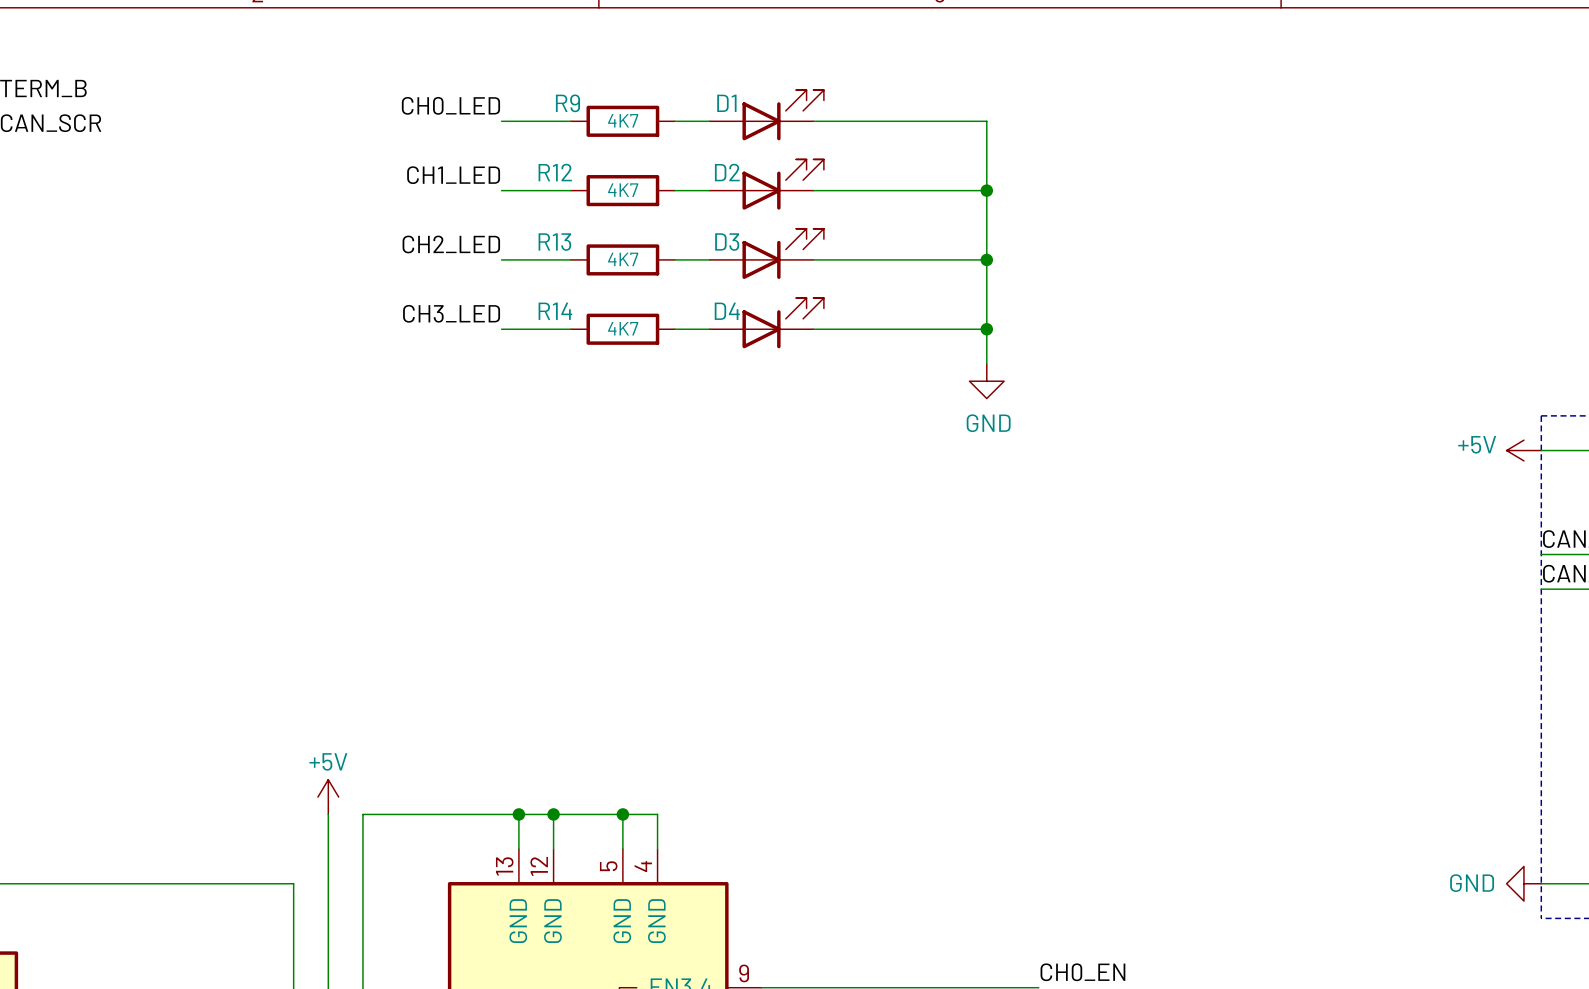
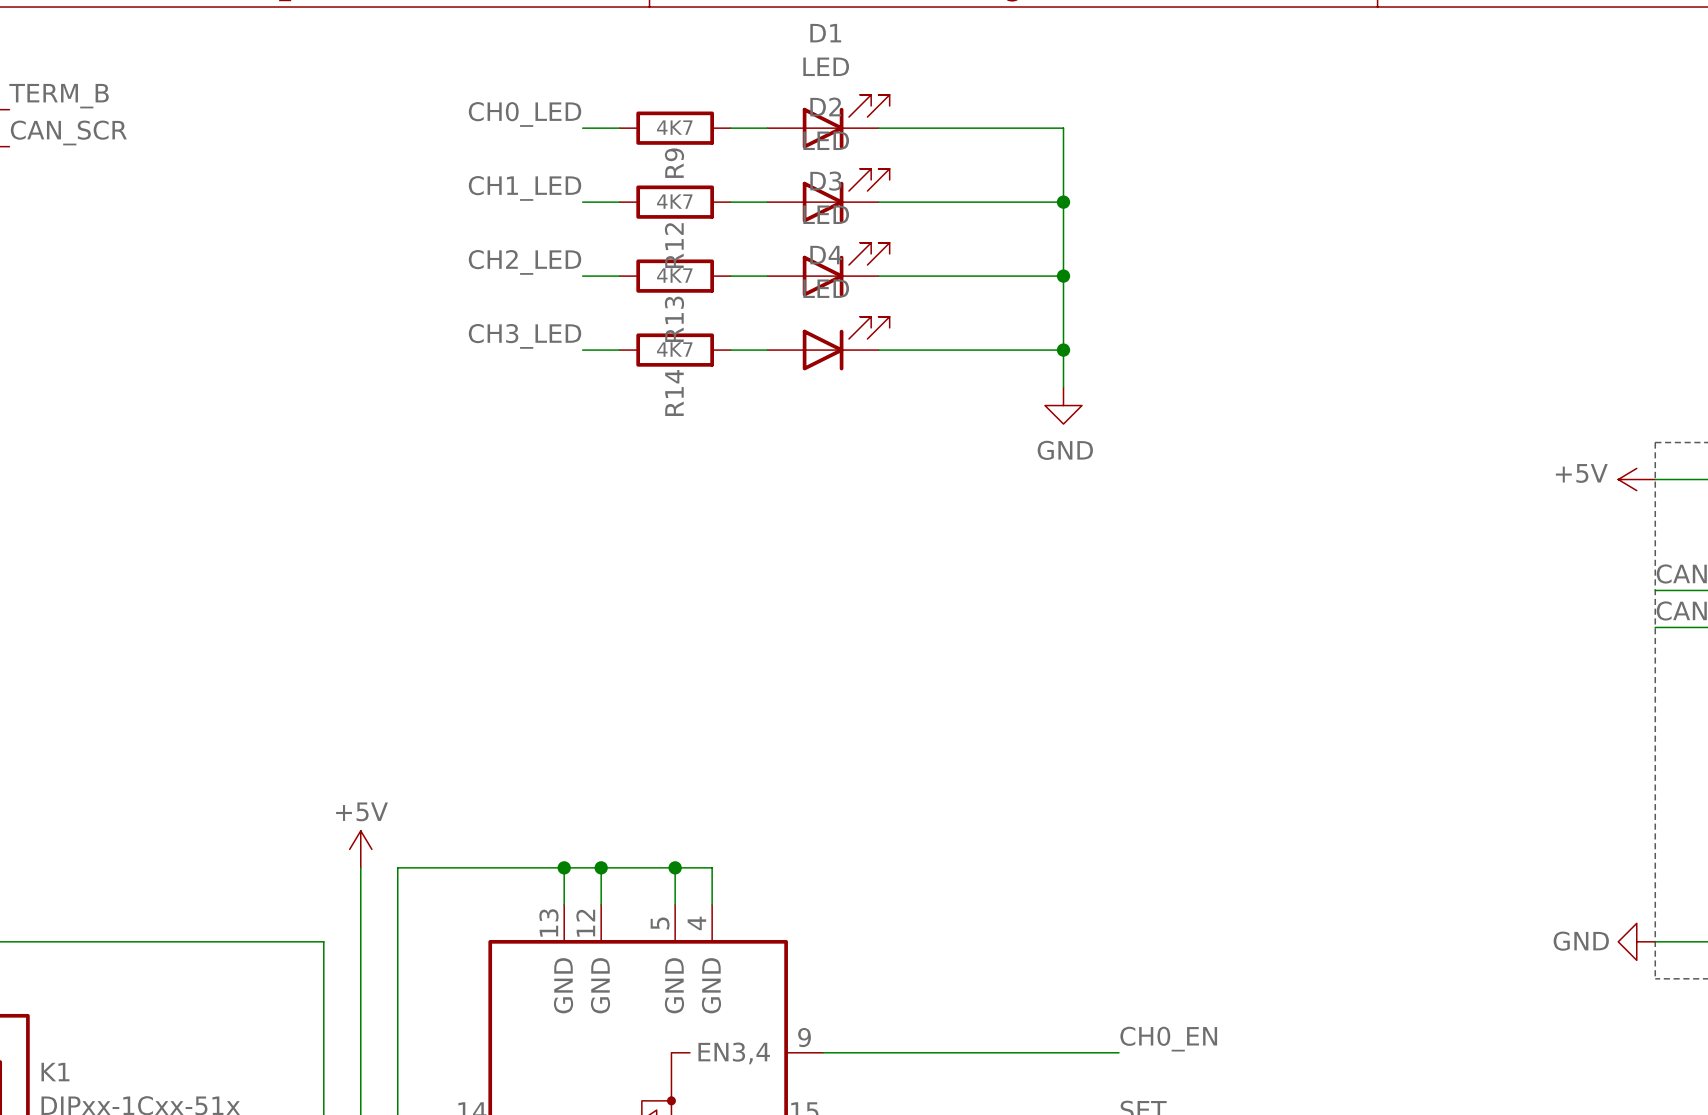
D1 value: none -> LED (826, 66)
R9 name rotation: 0° (567, 103) -> 90° counterclockwise (674, 163)
R9 name position: R9 (567, 103) -> R9 (674, 163)
D1 name position: D1 (726, 103) -> D1 (825, 33)
label position: CH0_LED (450, 105) -> CH0_LED (525, 114)
wire: (501, 121) (536, 121) -> none
D2 value: none -> LED (826, 140)
R12 name rotation: 0° (555, 172) -> 90° counterclockwise (674, 245)
R12 name position: R12 (555, 172) -> R12 (674, 245)
D2 name position: D2 (727, 172) -> D2 (825, 106)
label position: CH1_LED (453, 175) -> CH1_LED (525, 188)
wire: (501, 190) (536, 190) -> none
D3 value: none -> LED (826, 214)
R13 name rotation: 0° (554, 242) -> 90° counterclockwise (674, 319)
R13 name position: R13 (554, 242) -> R13 (674, 319)
D3 name position: D3 (727, 242) -> D3 (825, 181)
label position: CH2_LED (451, 244) -> CH2_LED (525, 262)
wire: (501, 259) (536, 259) -> none
D4 value: none -> LED (826, 288)
R14 name rotation: 0° (555, 311) -> 90° counterclockwise (674, 392)
R14 name position: R14 (555, 311) -> R14 (674, 392)
D4 name position: D4 (727, 311) -> D4 (826, 255)
label position: CH3_LED (451, 313) -> CH3_LED (525, 336)
wire: (501, 329) (536, 329) -> none

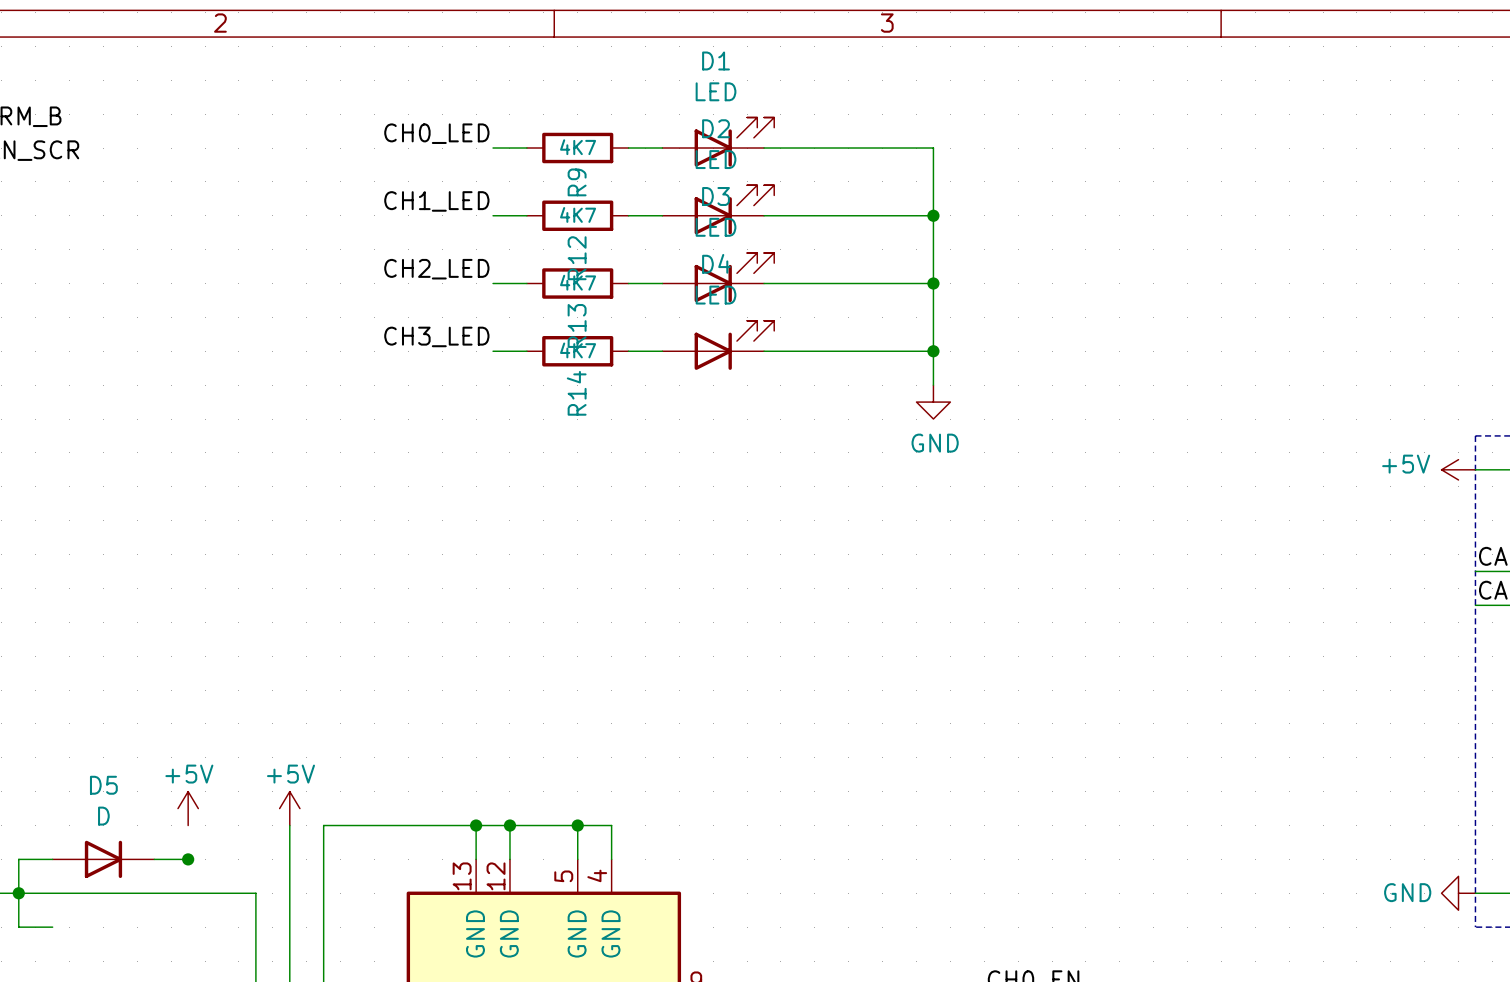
power symbol: none -> +5V (188, 808)
wire: none -> (52, 859) (18, 859) (18, 927) (52, 927)
D5: none -> D (103, 859)
wire: none -> (154, 859) (188, 859)
junction: none -> (188, 859)
junction: none -> (18, 893)

